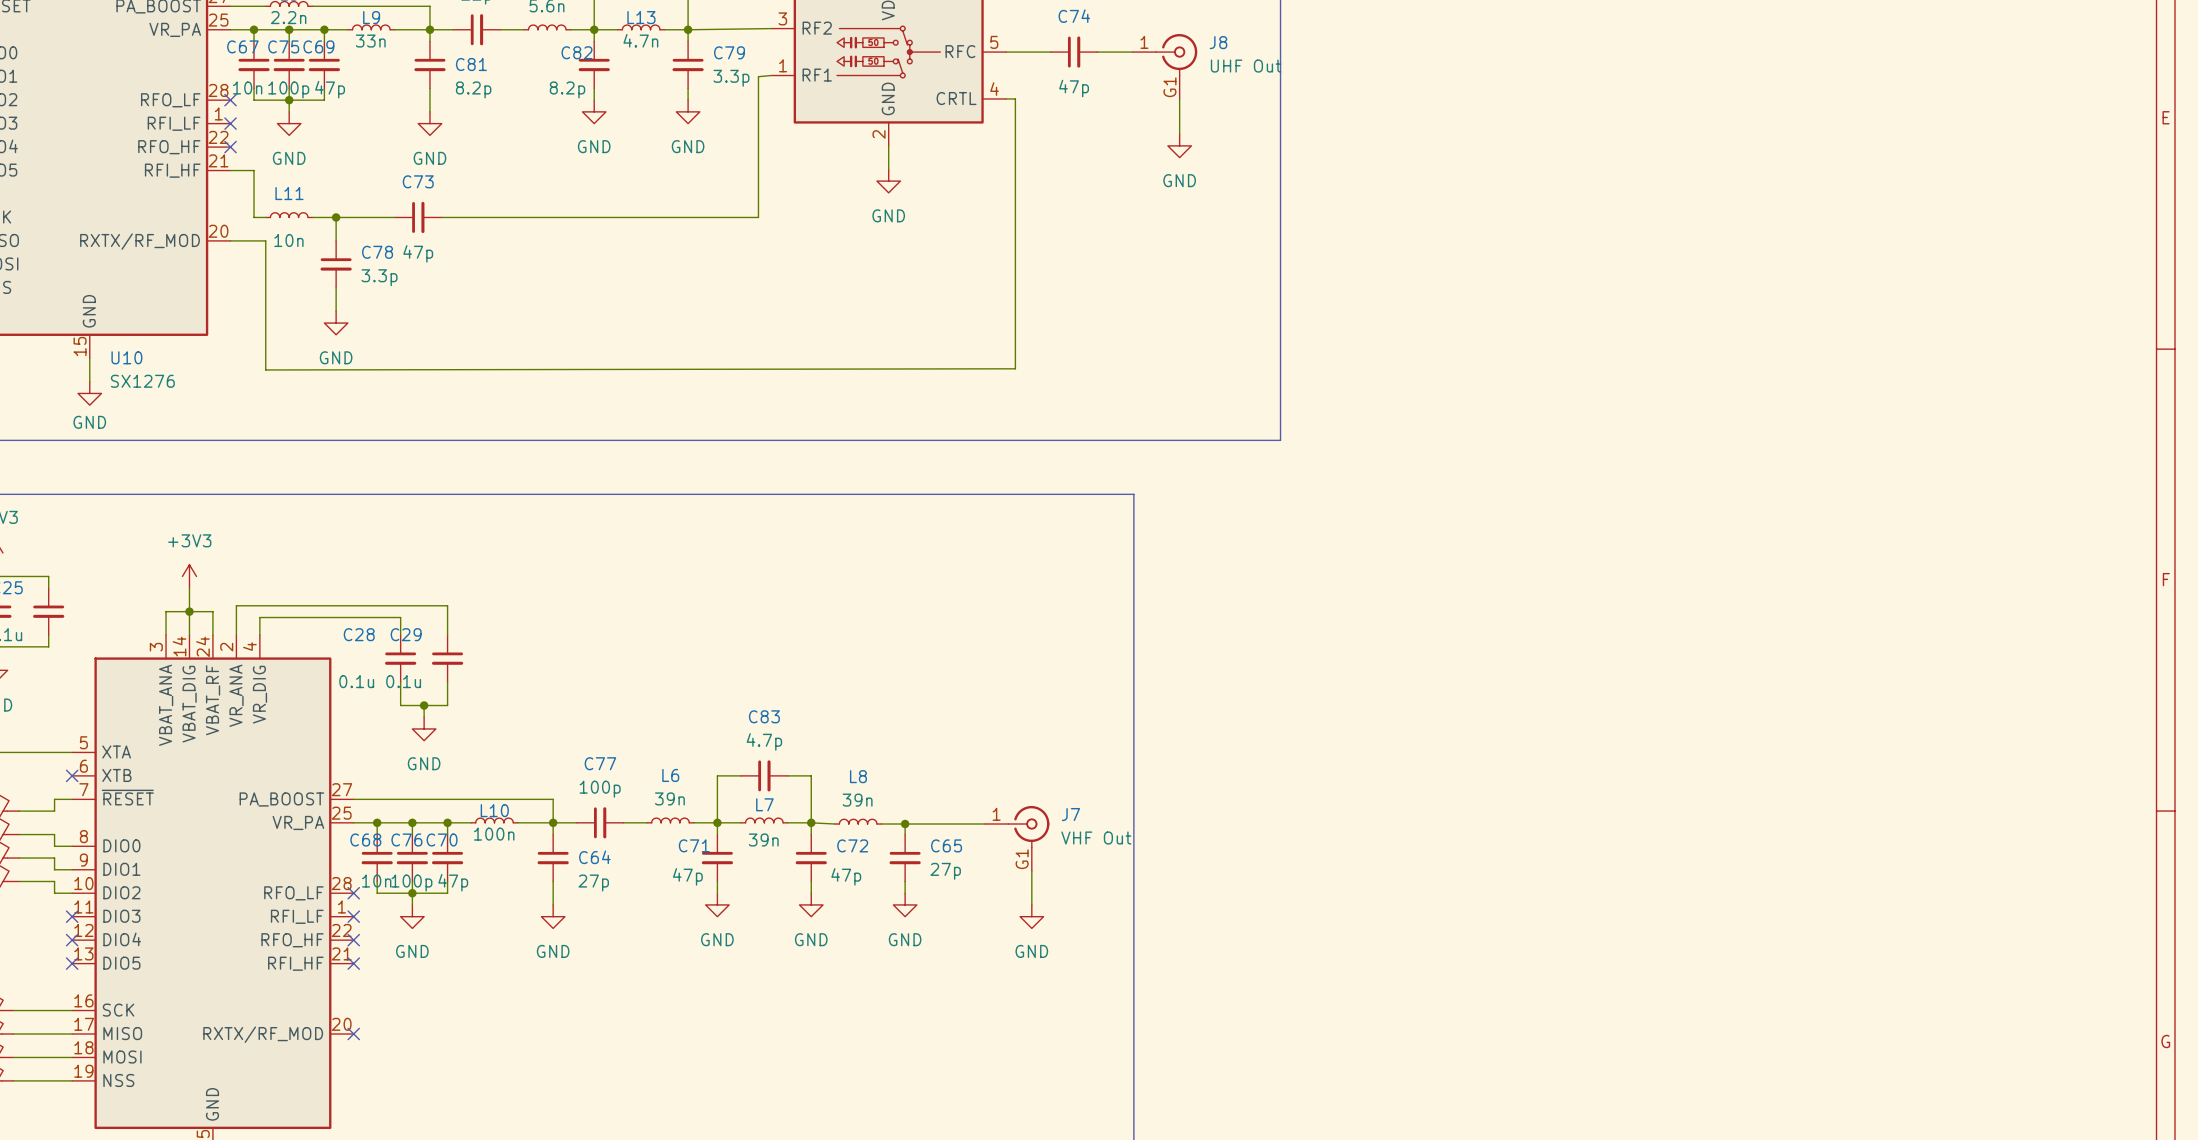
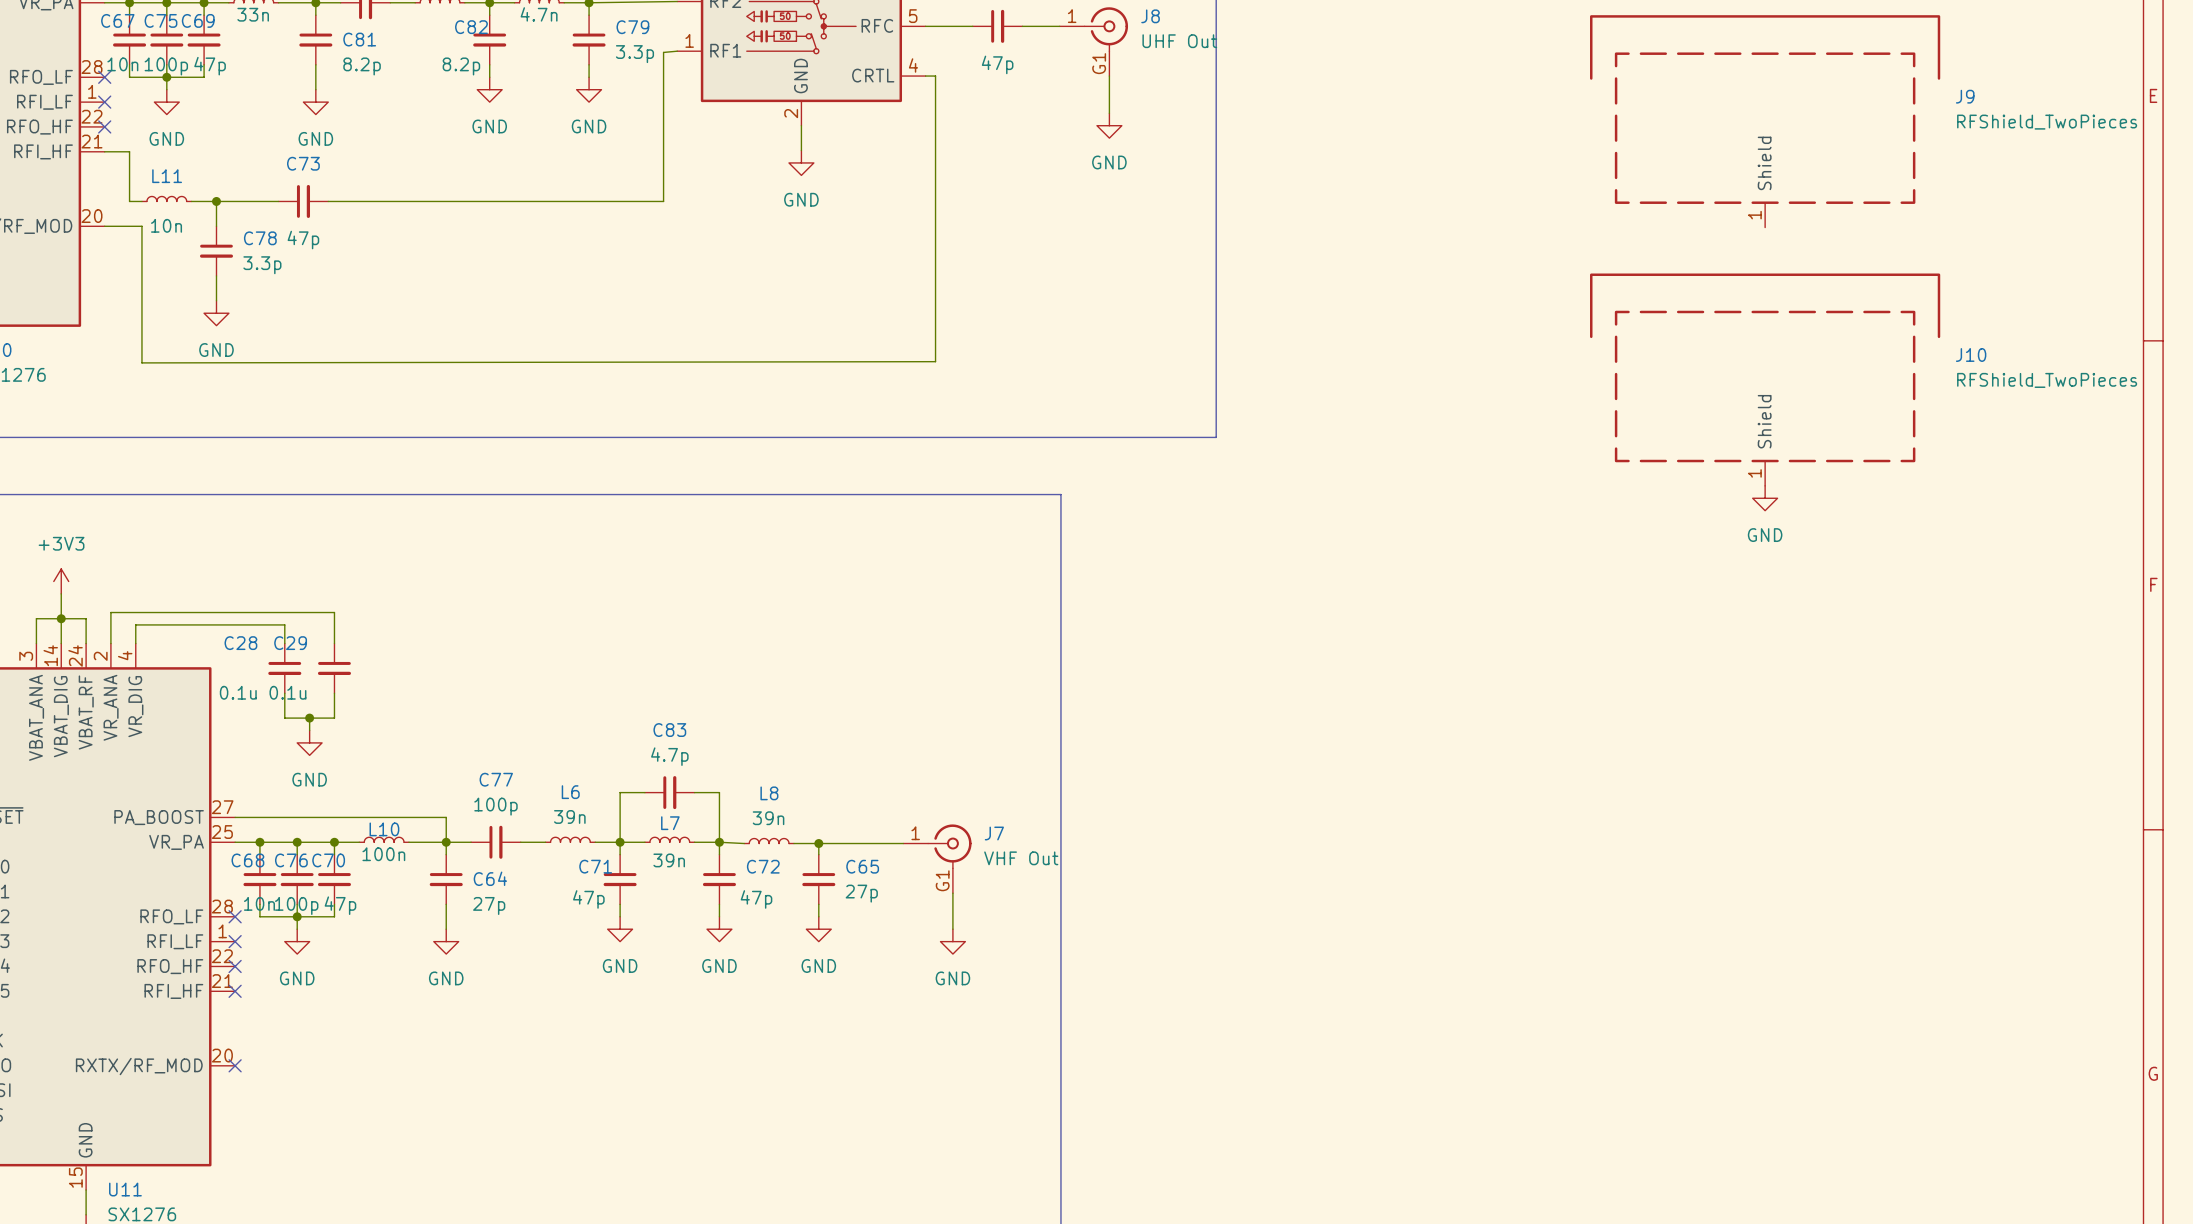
J9: none -> RFShield_TwoPieces (1765, 121)
J10: none -> RFShield_TwoPieces (1765, 379)
power symbol: none -> GND (1765, 498)

